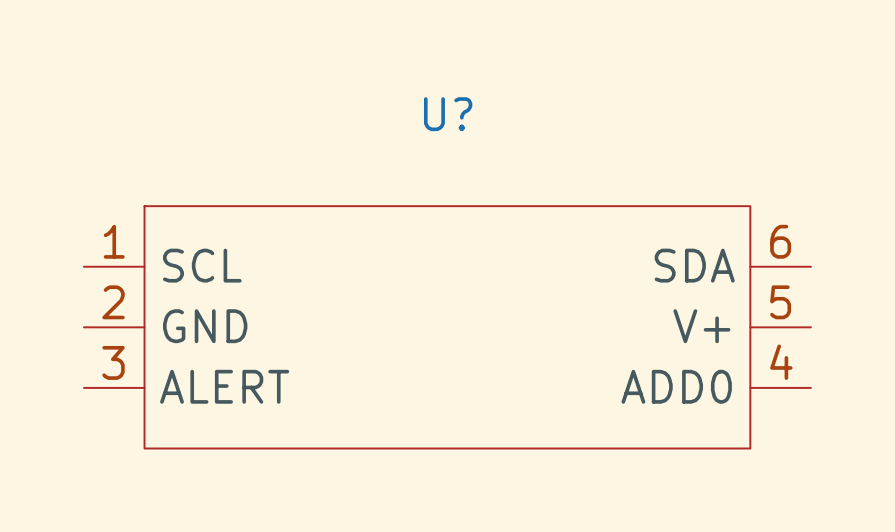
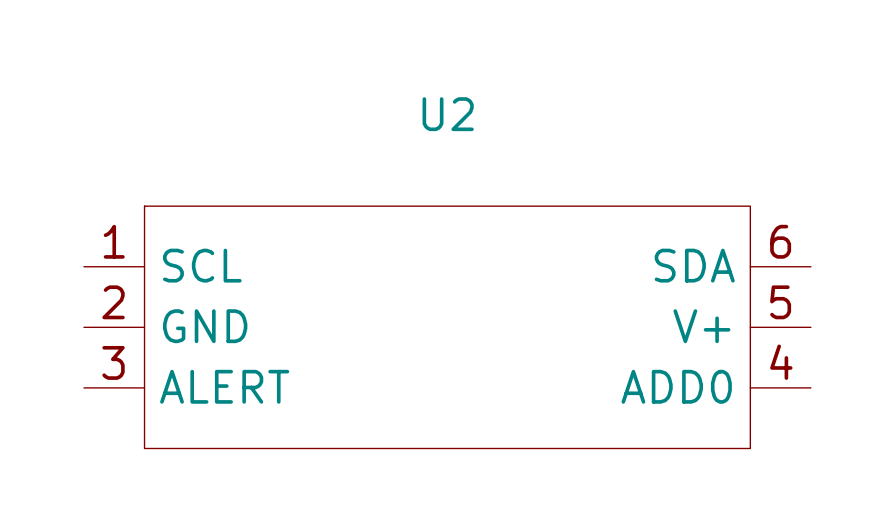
U? name: U? (448, 114) -> U2 (448, 114)

